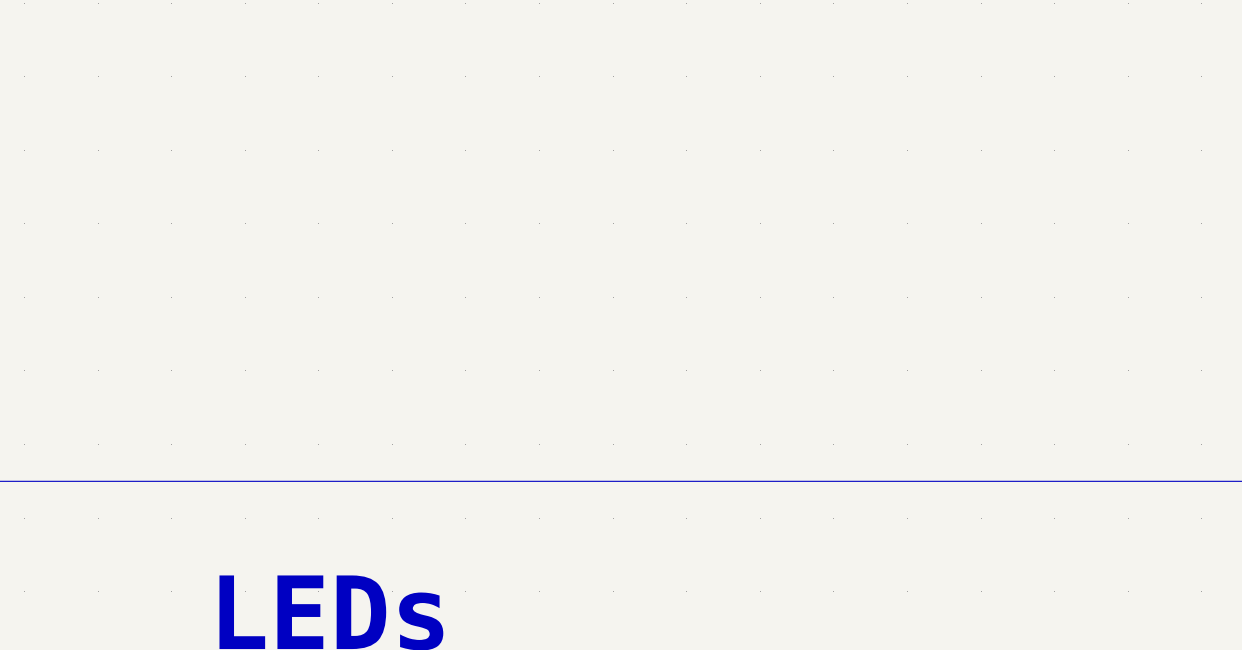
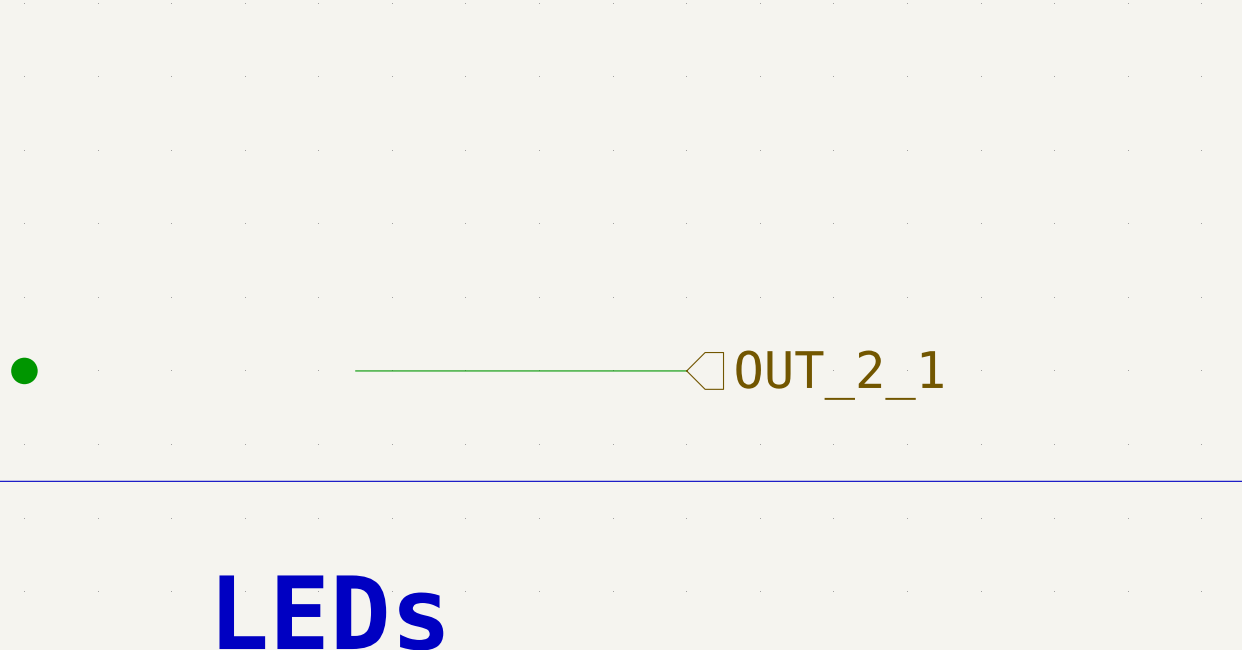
junction: none -> (24, 370)
wire: none -> (355, 370) (686, 370)
hierarchical label: none -> OUT_2_1 (839, 375)

